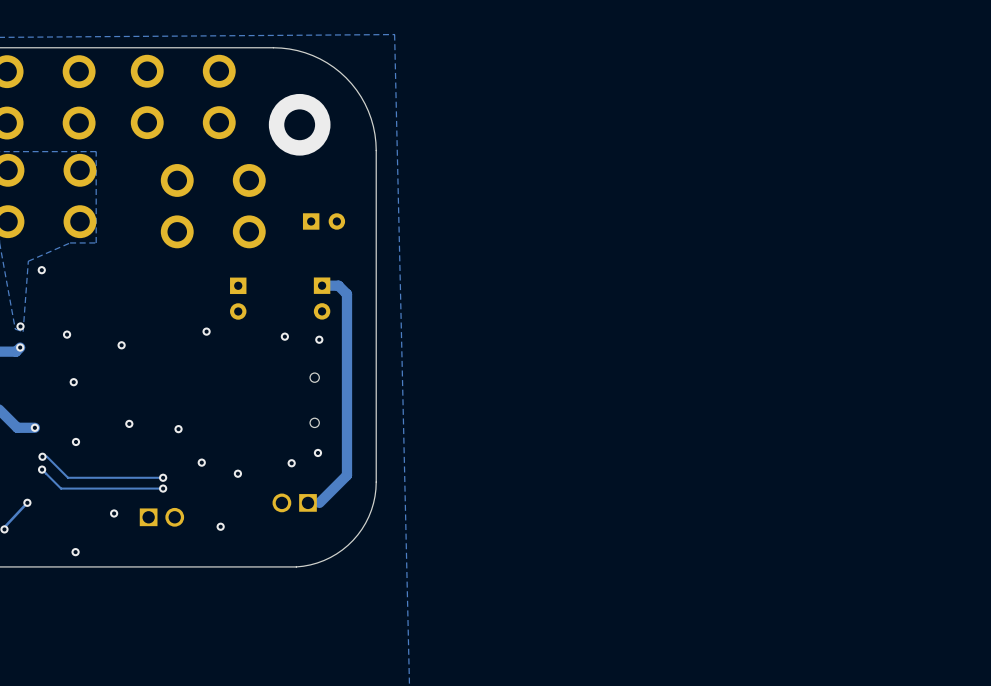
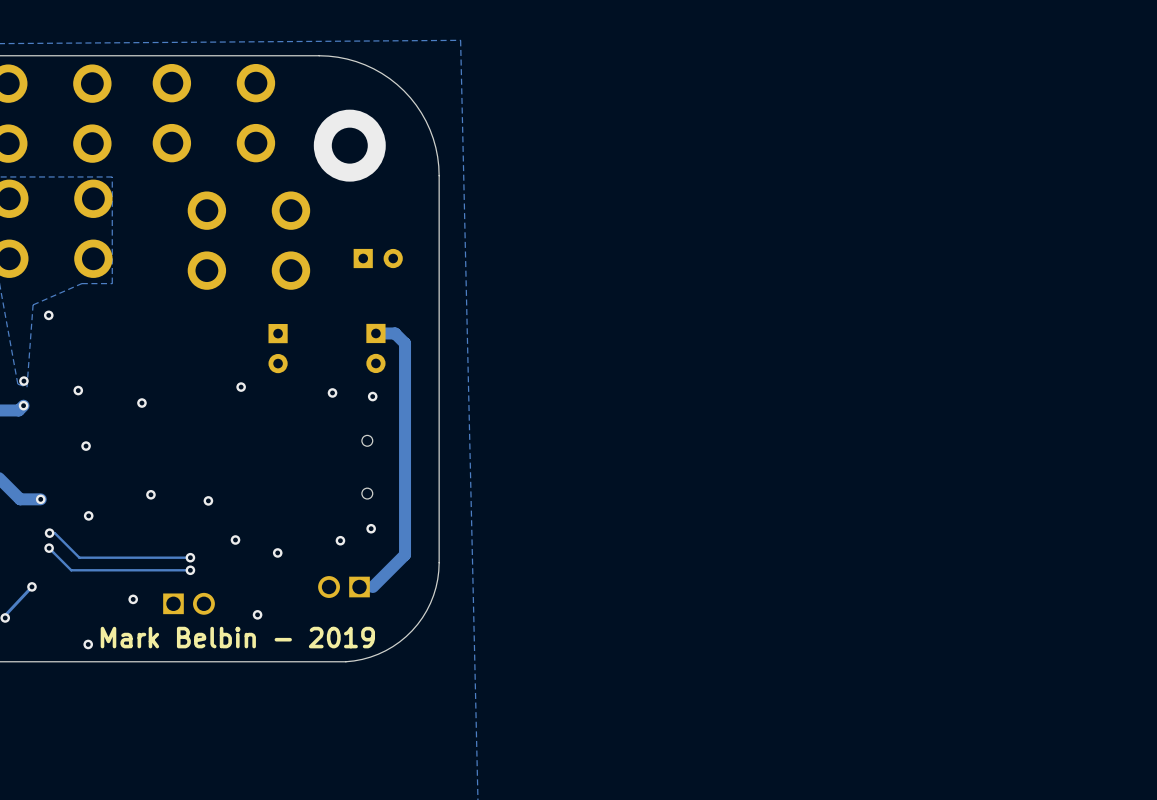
text: none -> Mark Belbin - 2019 (237, 637)

